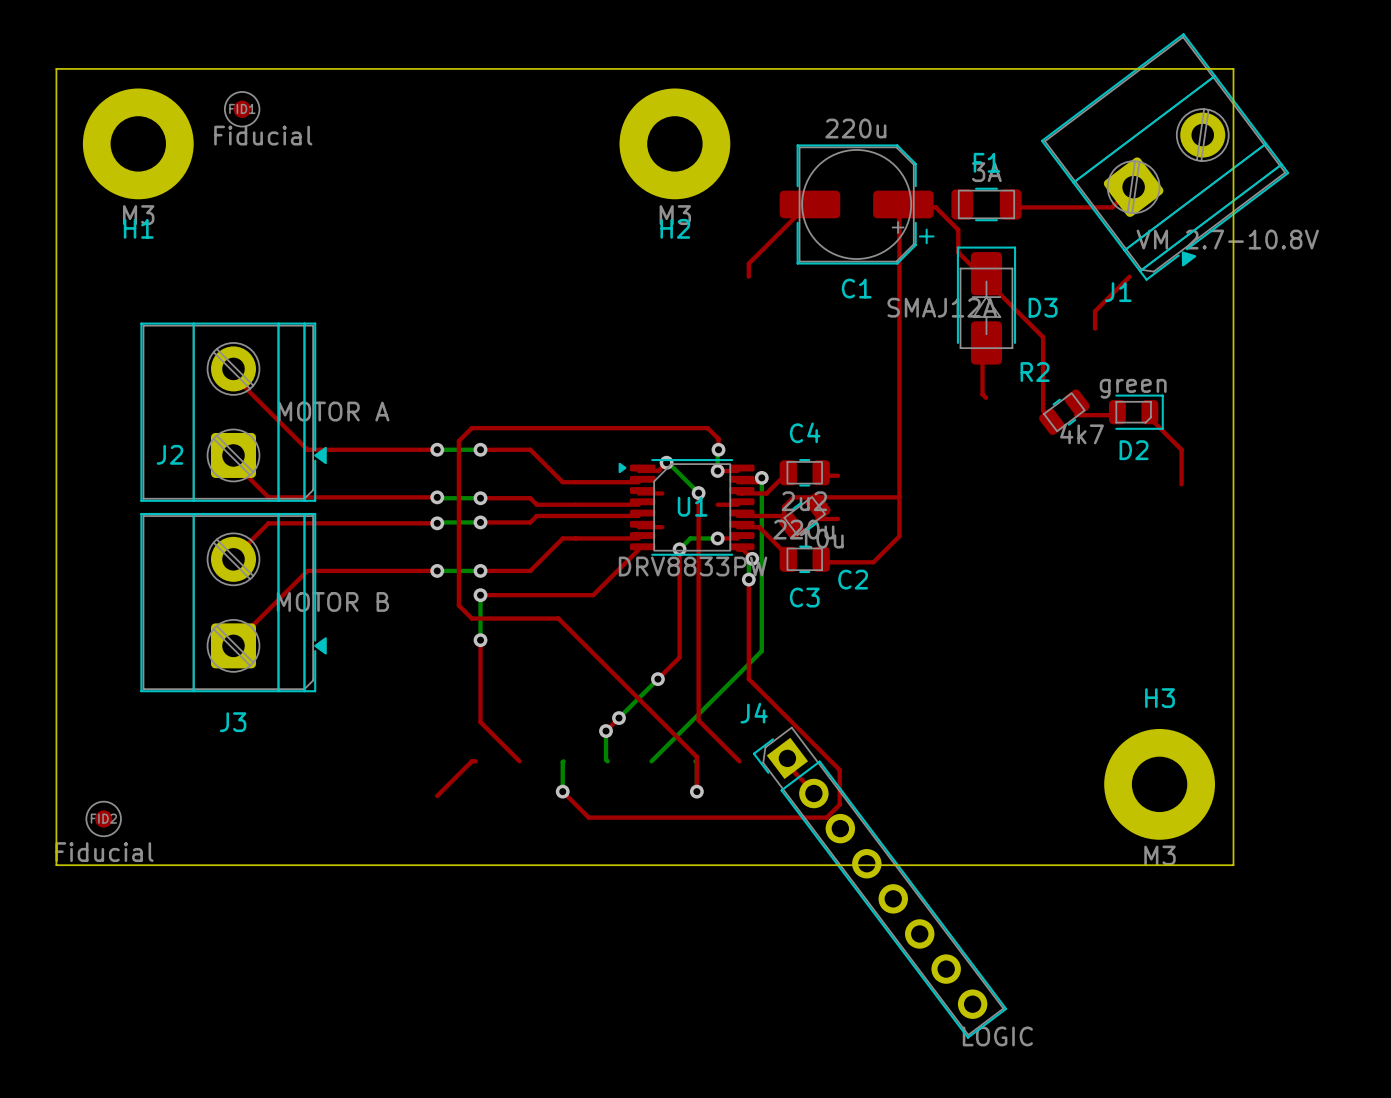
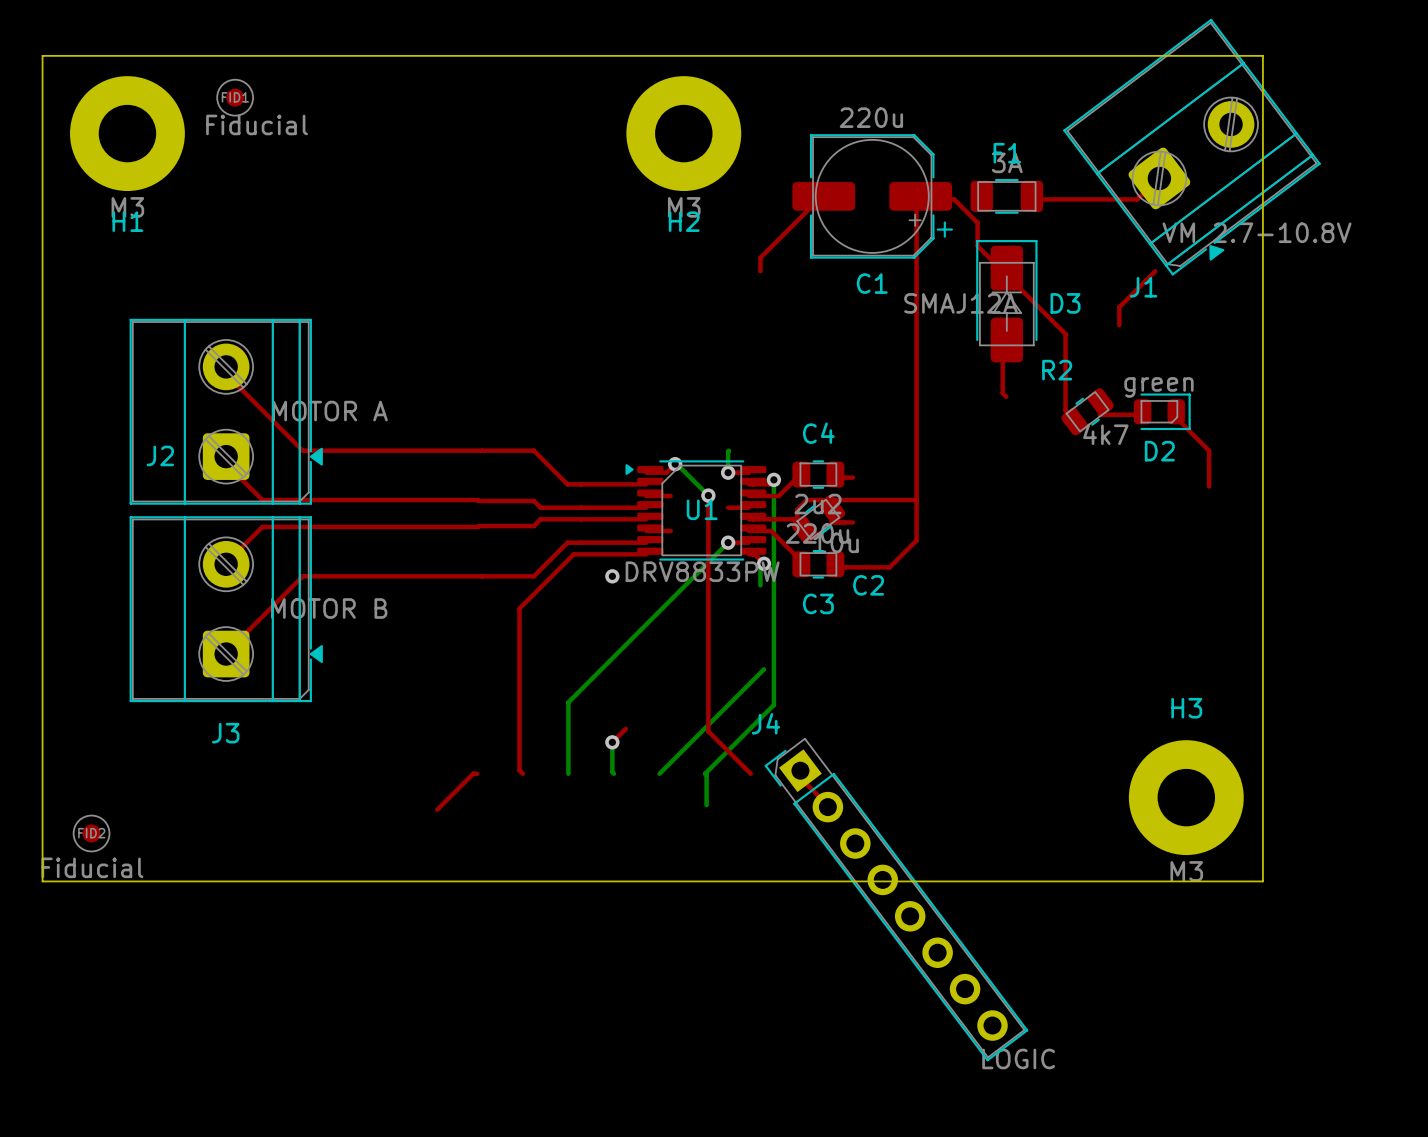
top track: none -> (437, 450) (482, 450)
bottom track: (437, 449) (480, 449) -> none
via: (437, 449) -> none
via: (480, 449) -> none
top track: (718, 449) (718, 438) (707, 428) (471, 428) (458, 441) (458, 605) (471, 618) (558, 618) (696, 757) (696, 791) -> none
via: (718, 449) -> none
top track: none -> (437, 500) (482, 500)
bottom track: (437, 497) (480, 498) -> none
via: (437, 497) -> none
via: (480, 498) -> none
top track: none -> (482, 526) (437, 526)
bottom track: (480, 522) (437, 523) -> none
via: (480, 522) -> none
via: (437, 523) -> none
bottom track: (717, 538) (690, 538) (679, 549) -> (728, 542) (568, 702) (568, 773)
top track: (638, 549) (593, 595) (480, 595) -> (646, 554) (573, 554) (519, 608) (519, 770)
top track: (679, 549) (679, 657) (657, 679) -> none
via: (679, 549) -> none
top track: none -> (437, 576) (482, 576)
bottom track: (437, 570) (480, 570) -> none
via: (437, 570) -> none
via: (480, 570) -> none
via: none -> (612, 576)
top track: (748, 579) (748, 679) (839, 769) (839, 804) (826, 817) (588, 817) (562, 791) -> none
via: (748, 579) -> none
bottom track: (480, 595) (480, 640) -> none
via: (480, 595) -> none
top track: (480, 640) (480, 722) (516, 758) -> none
via: (480, 640) -> none
bottom track: (761, 651) (752, 660) -> (773, 659) (773, 705) (705, 773)
bottom track: (657, 679) (618, 718) -> none
via: (657, 679) -> none
via: (618, 718) -> none
bottom track: (563, 761) (562, 791) -> none
via: (562, 791) -> none
via: (696, 791) -> none

